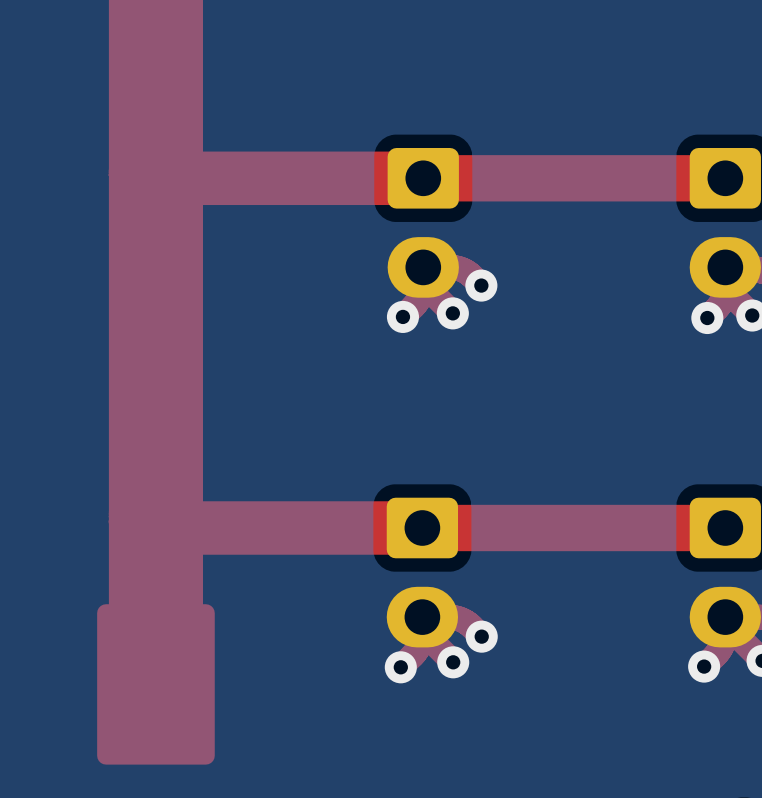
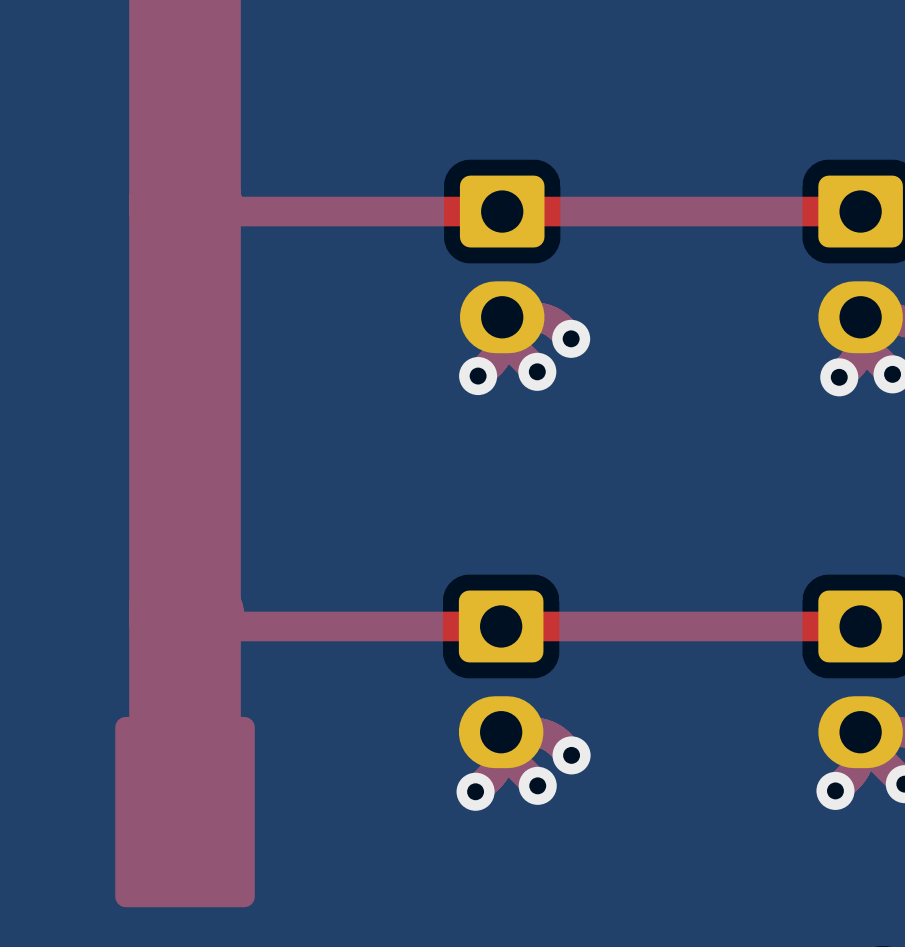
top track width: thick (725, 178) (164, 178) -> thin (860, 211) (195, 211)
top track width: thick (725, 528) (172, 528) -> thin (860, 626) (204, 626)

